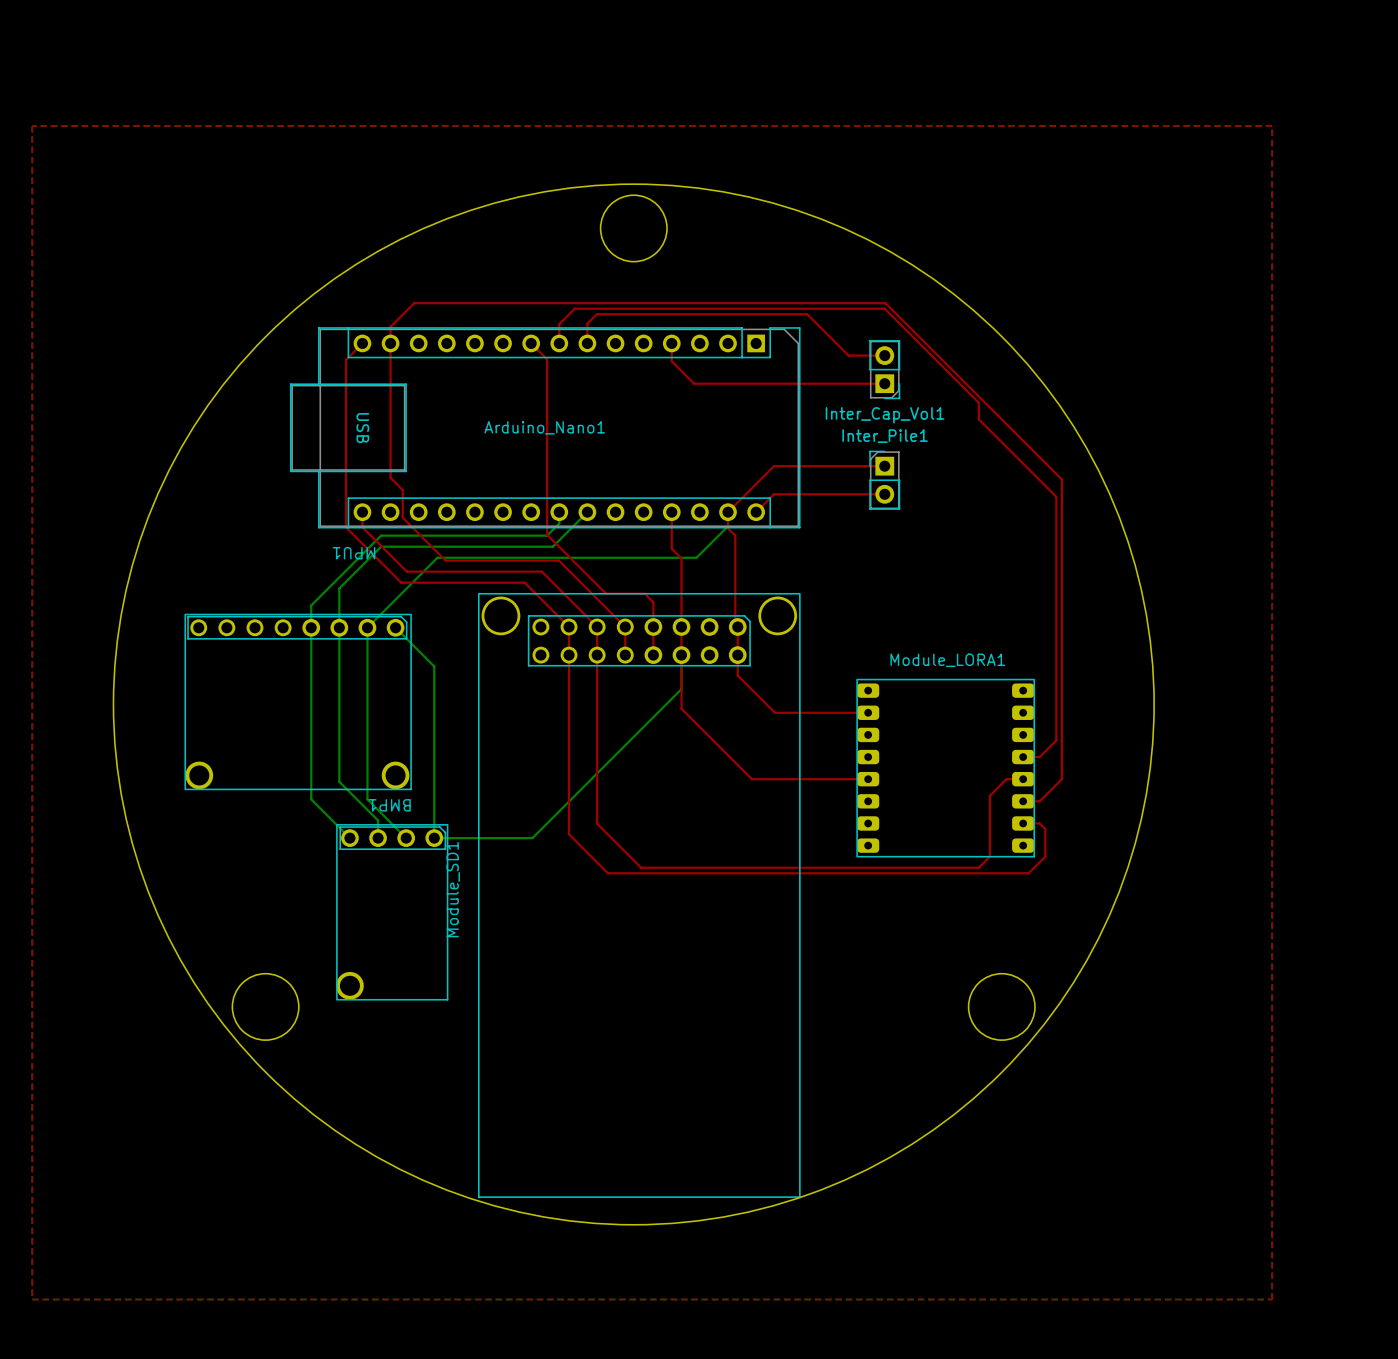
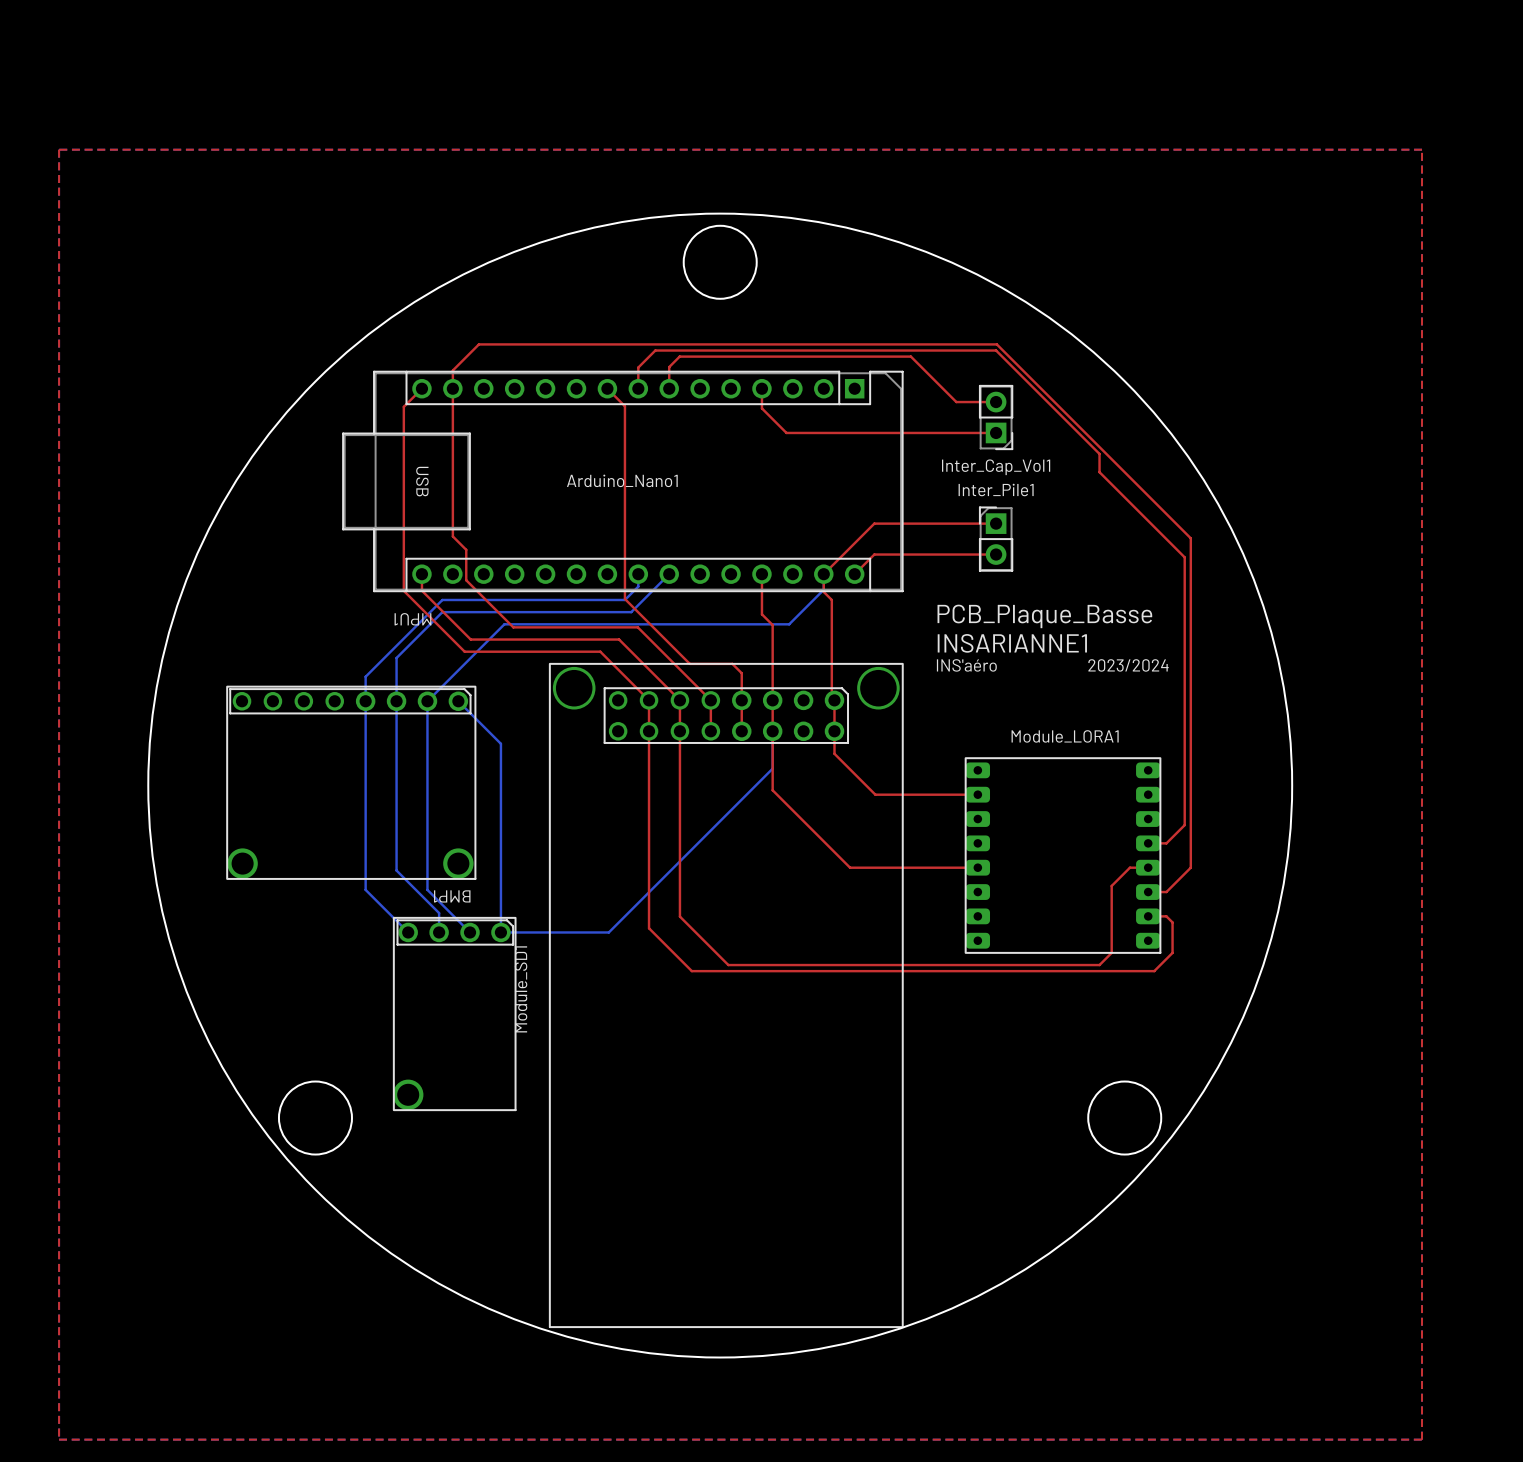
text: none -> PCB_Plaque_Basse (1044, 616)
text: none -> INSARIANNE1 (1012, 643)
text: none -> INS'aéro (966, 665)
text: none -> 2023/2024 (1128, 665)

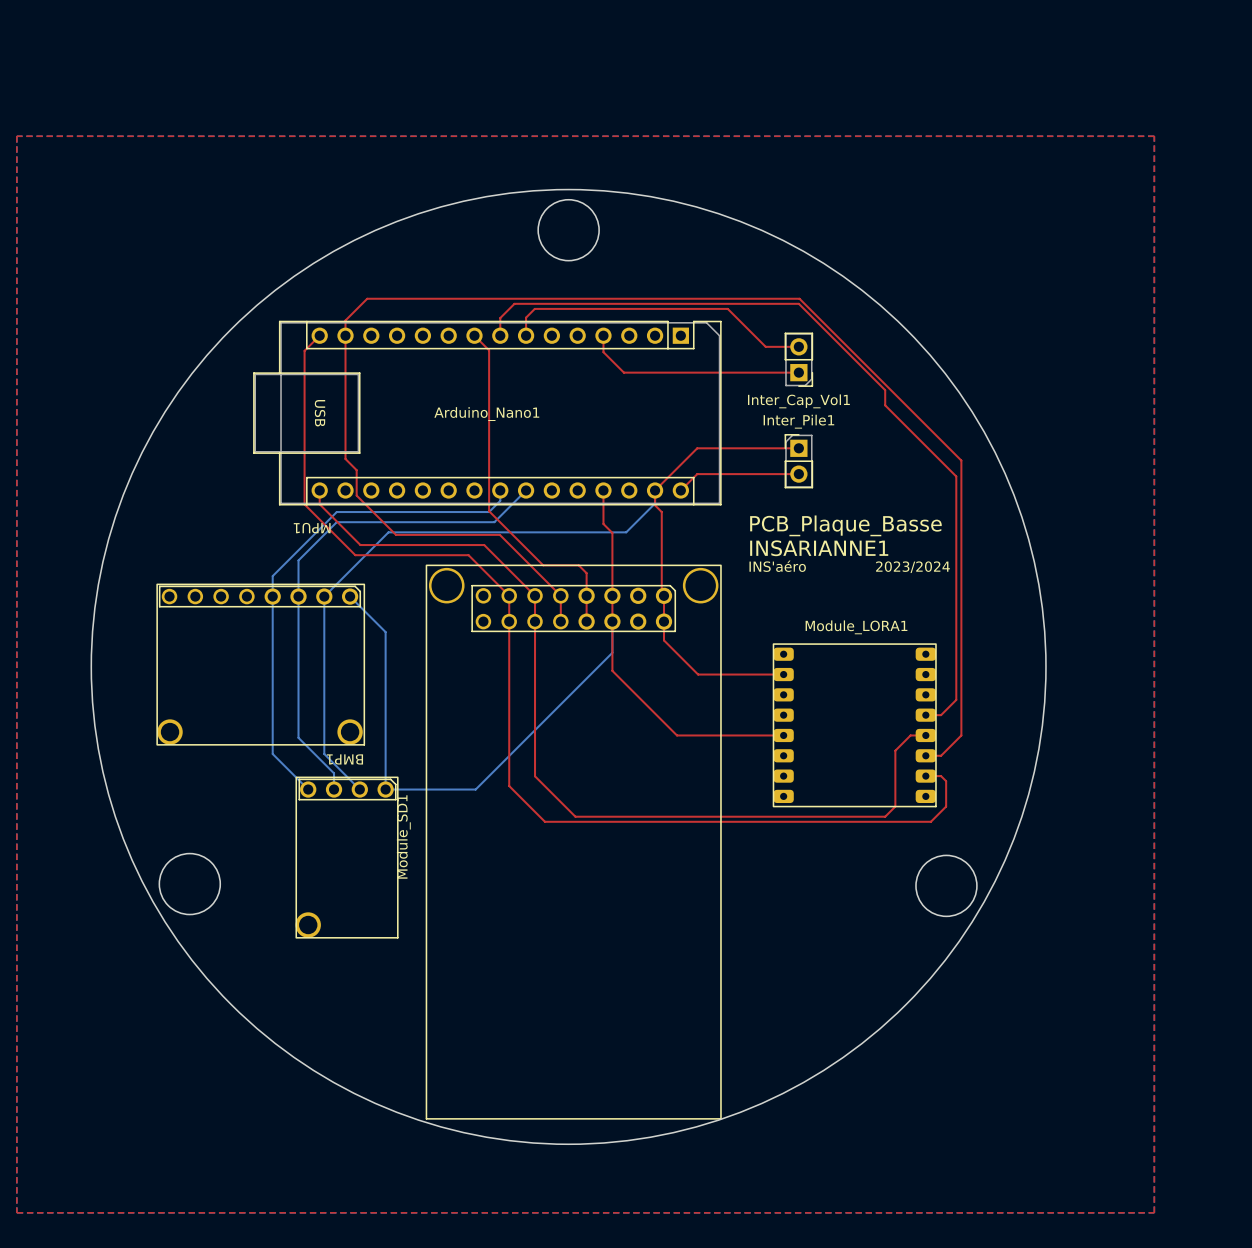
round board edge position: (315, 1118) -> (189, 884)
round board edge position: (1124, 1118) -> (946, 885)

